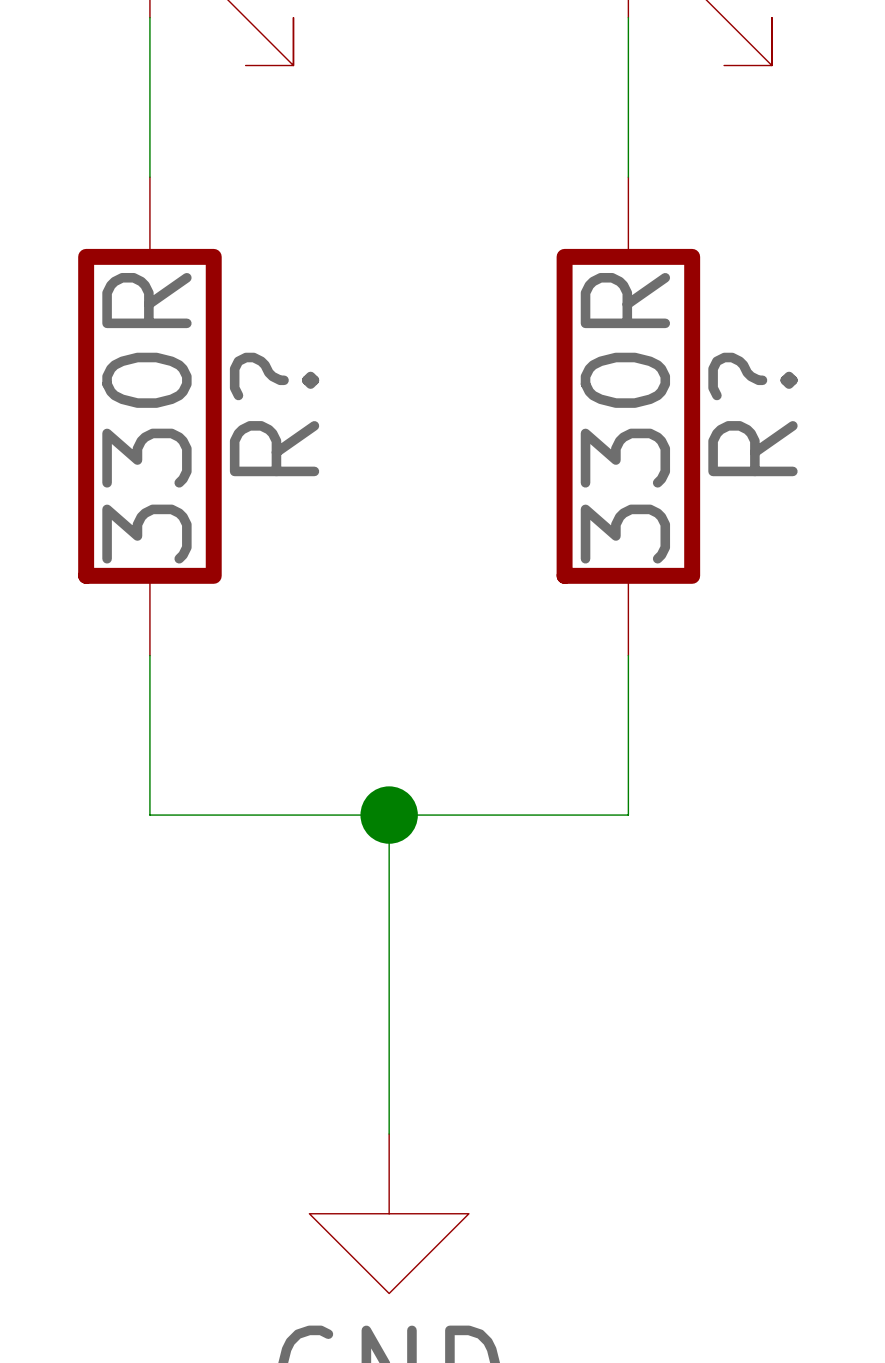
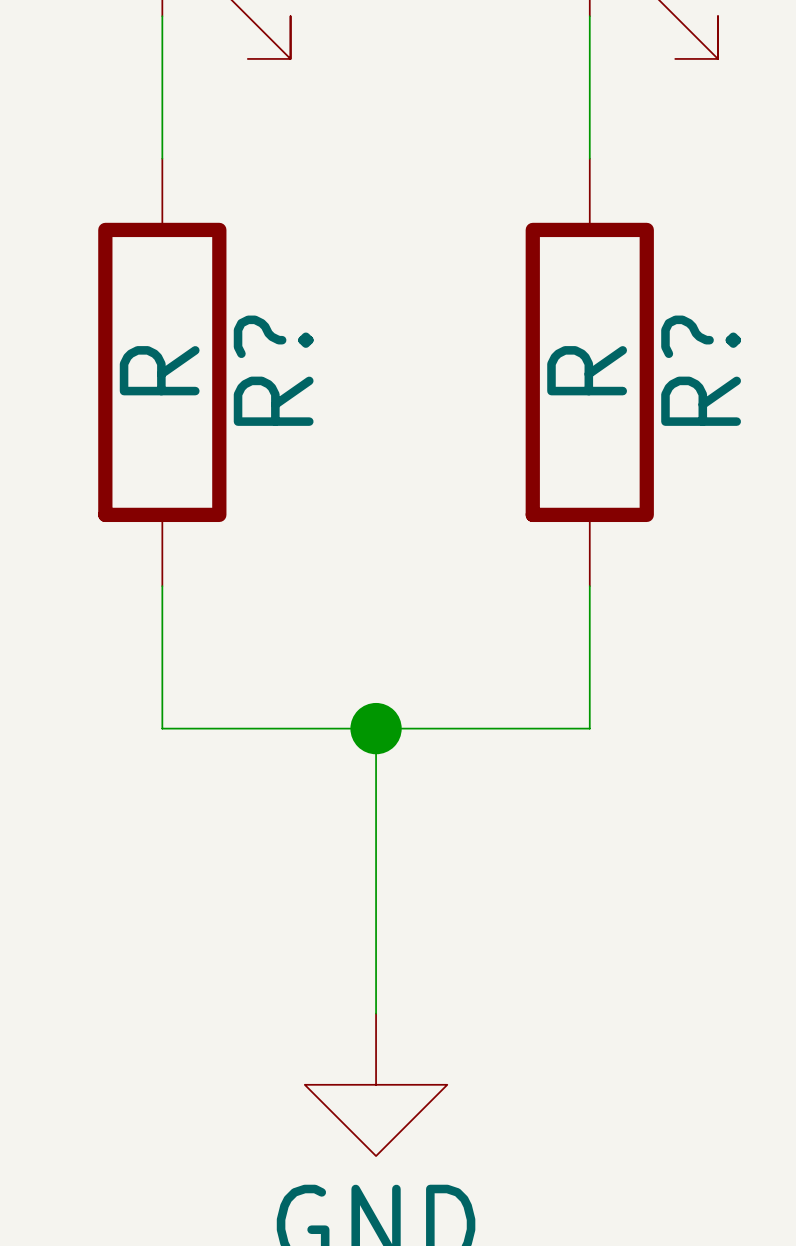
R? value: 330R (146, 418) -> R (159, 370)
R? value: 330R (625, 418) -> R (587, 370)

